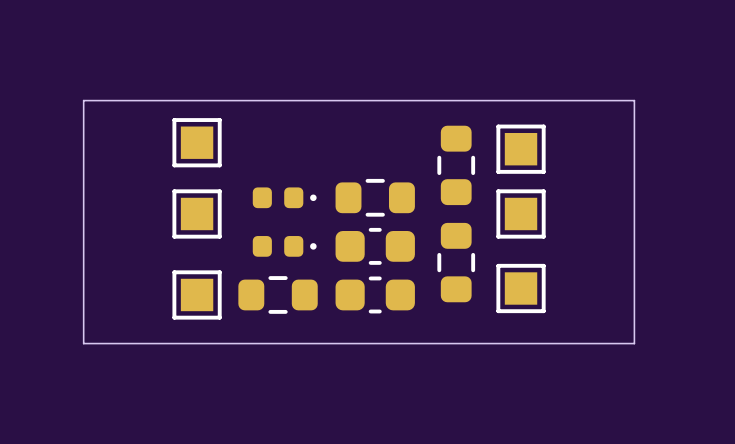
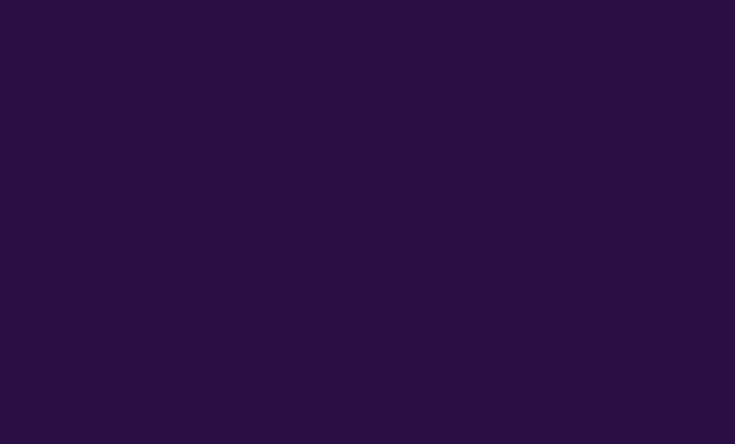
board edge: (83, 100) (634, 100) (634, 343) (83, 343) (83, 100) -> none
part: (197, 142) -> none
part: (521, 149) -> none
part: (456, 165) -> none
part: (284, 197) -> none
part: (375, 197) -> none
part: (197, 213) -> none
part: (521, 213) -> none
part: (284, 246) -> none
part: (375, 246) -> none
part: (456, 262) -> none
part: (521, 288) -> none
part: (197, 294) -> none
part: (278, 294) -> none
part: (375, 294) -> none

